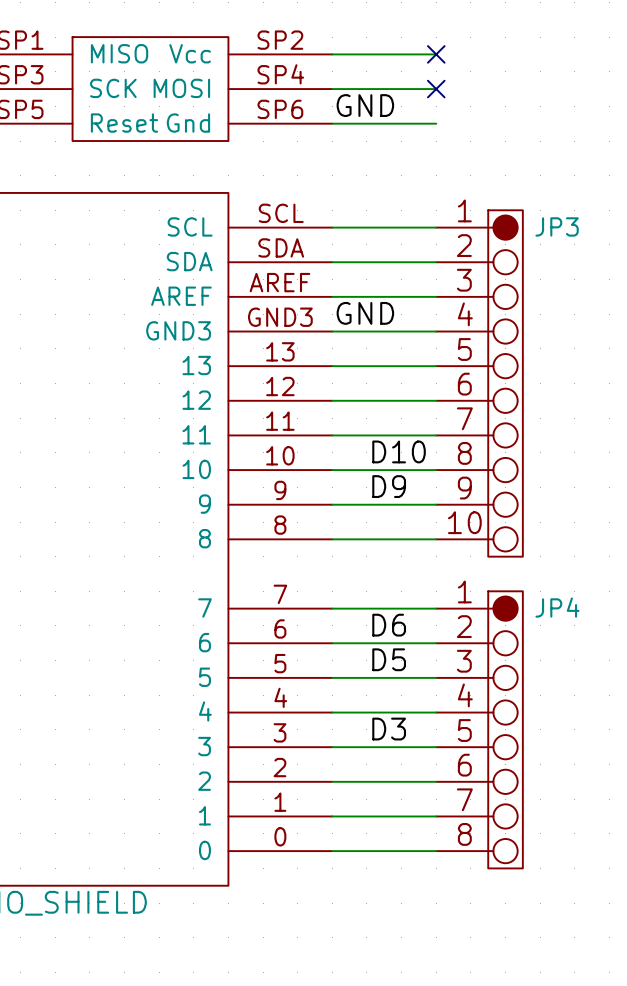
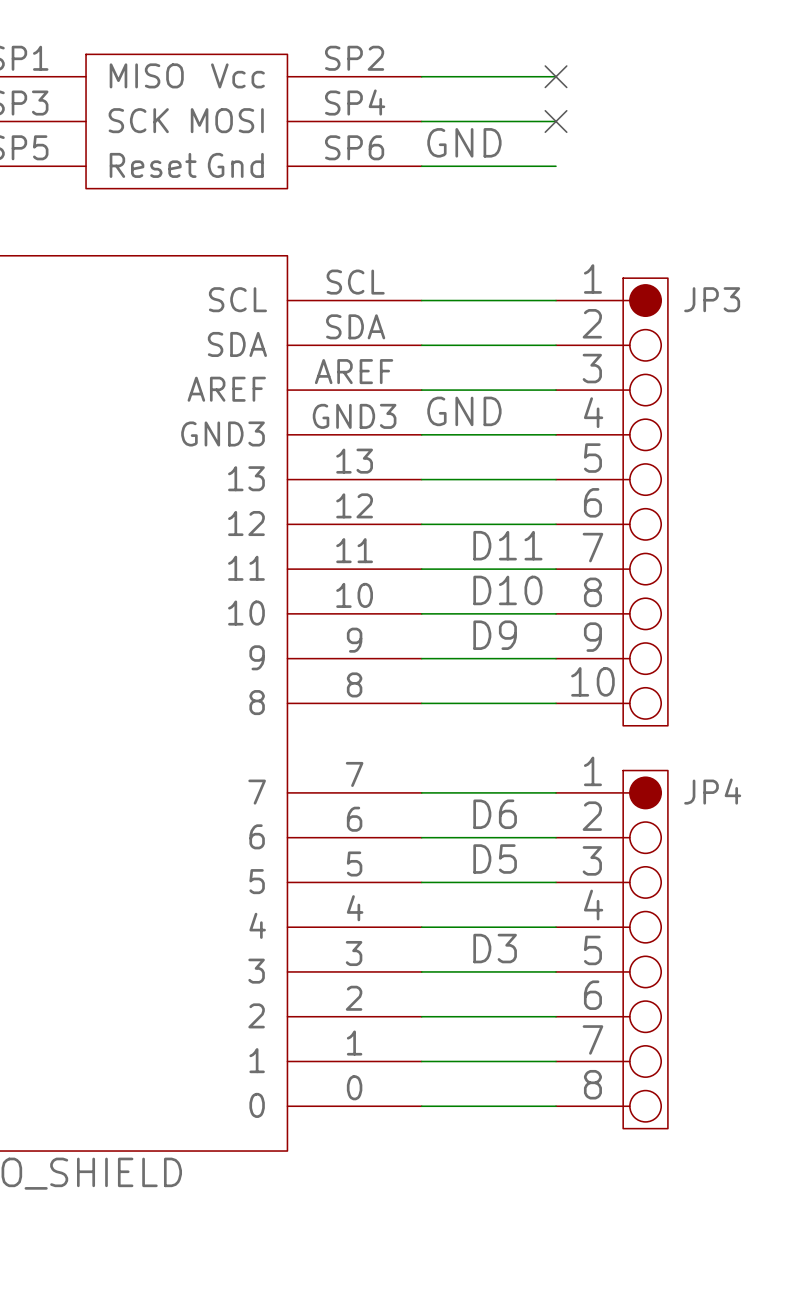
label: none -> D11 (507, 545)

